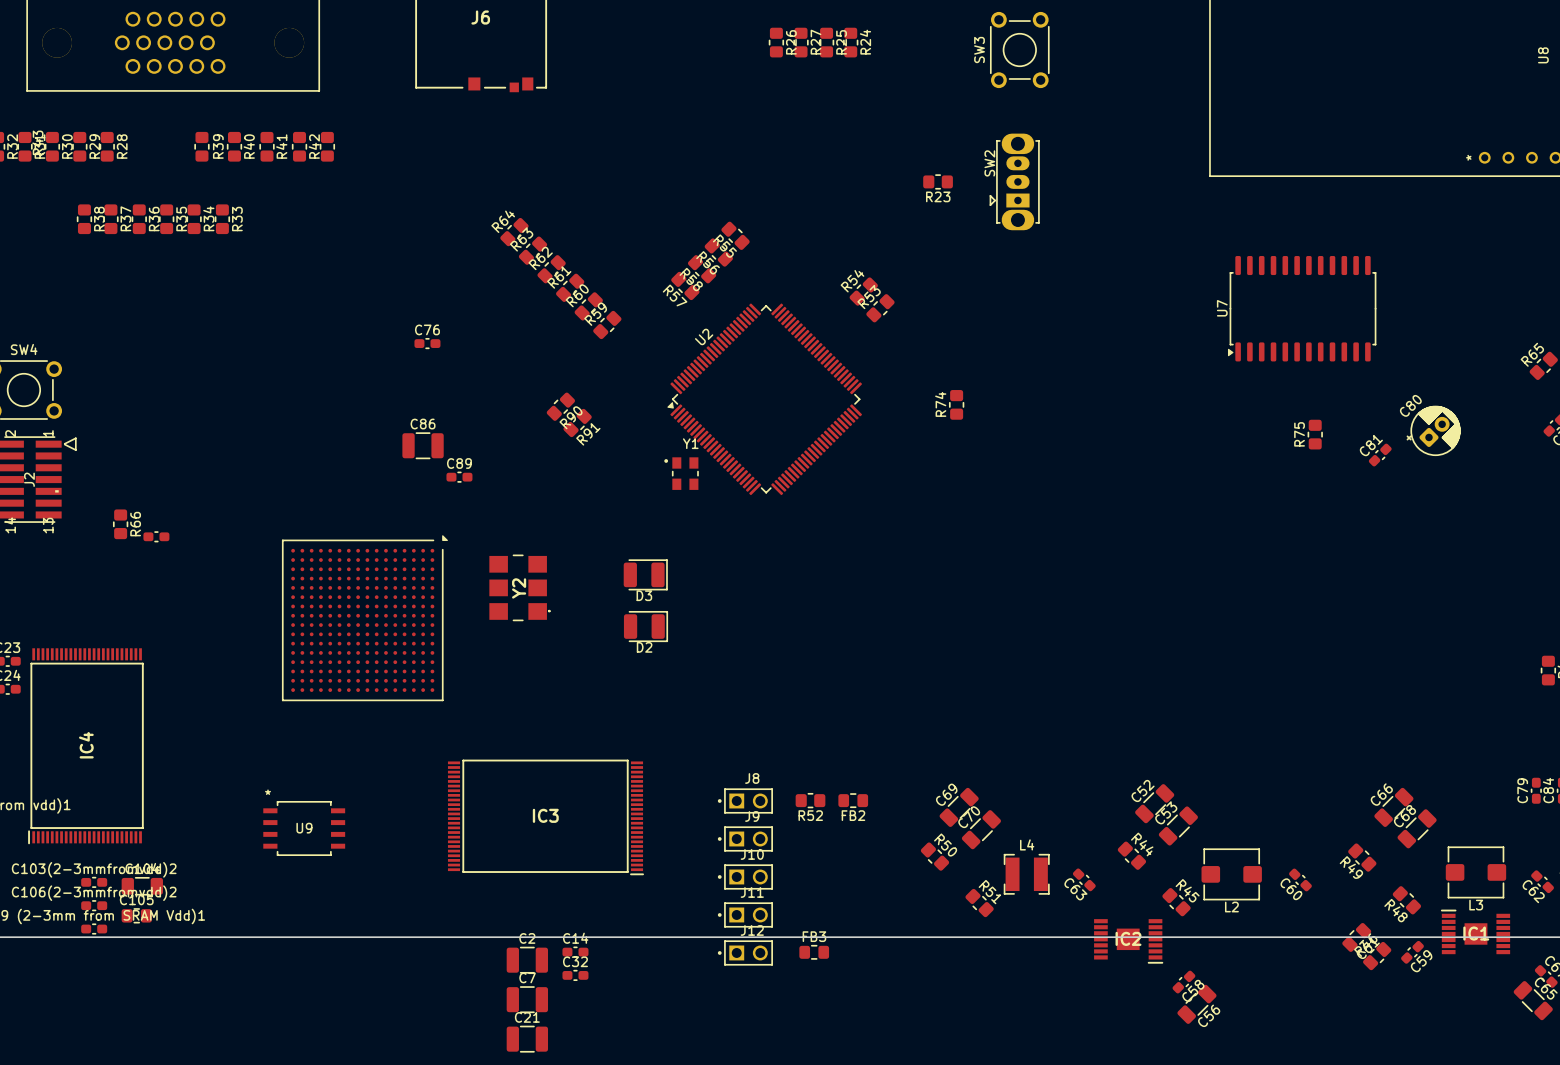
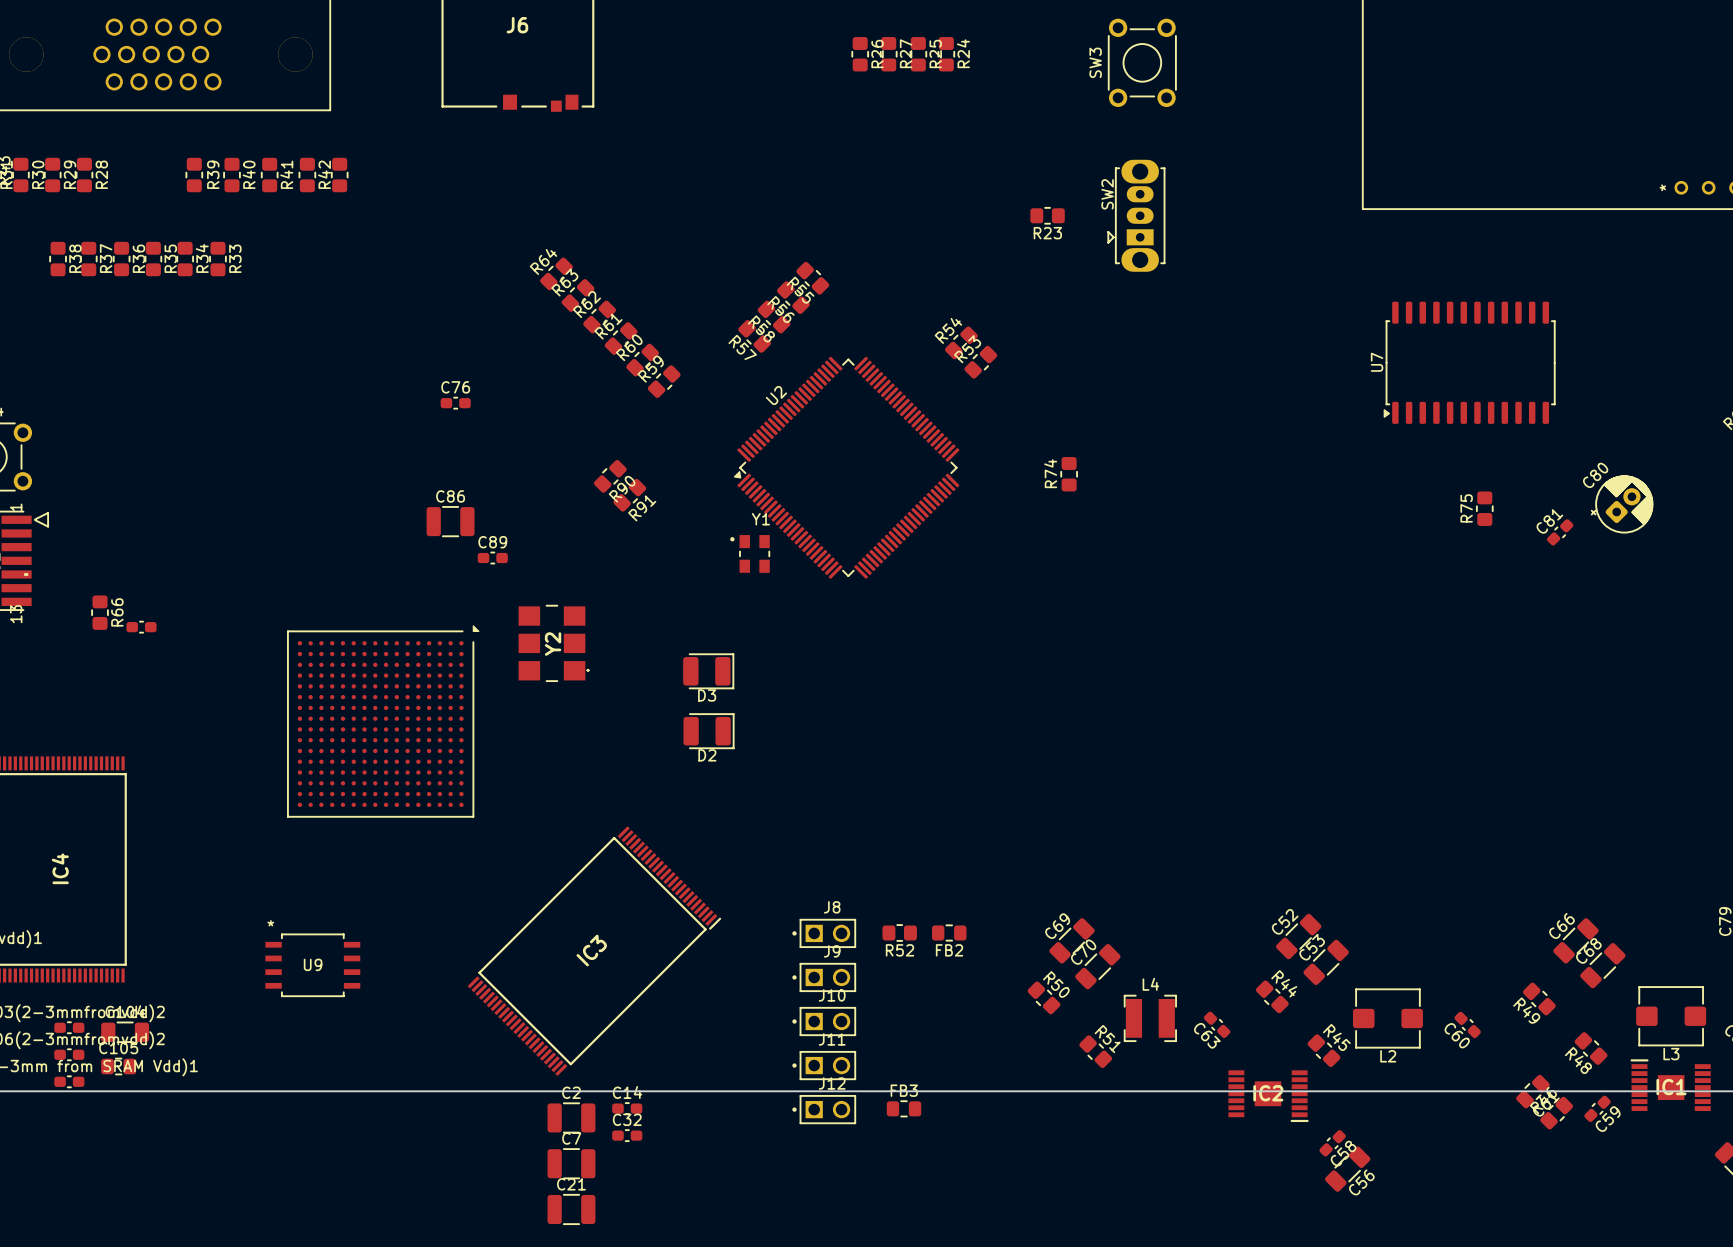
Y2 position: (519, 587) -> (553, 643)
IC3 rotation: 0° (545, 817) -> 45° counterclockwise (594, 951)

